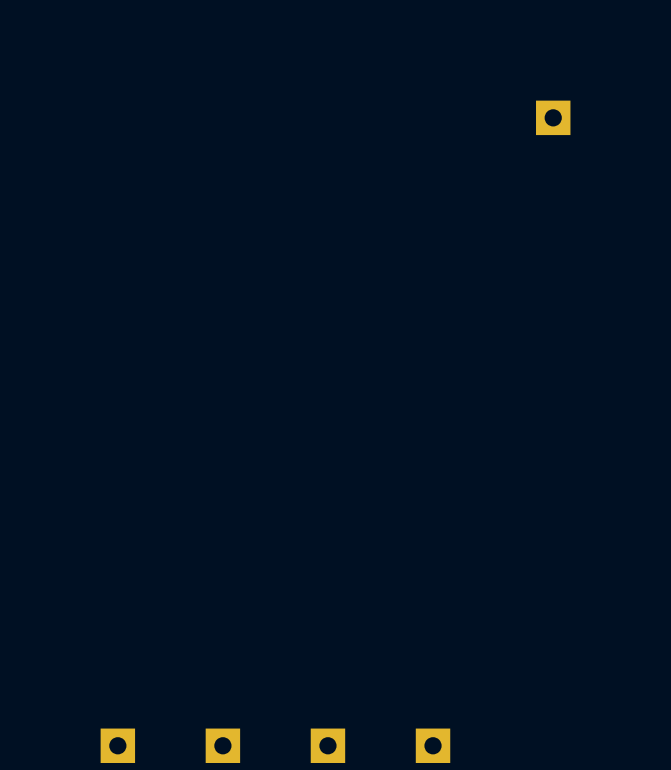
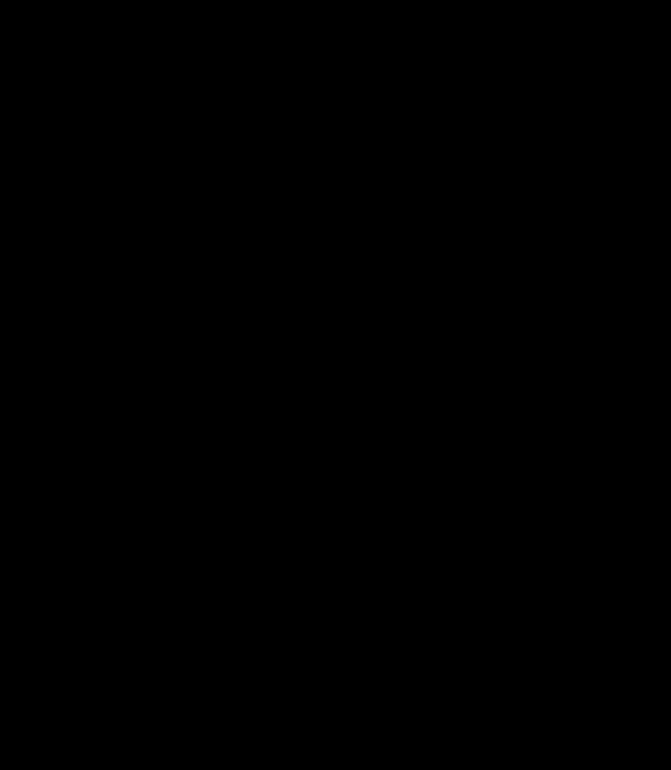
part: (553, 117) -> none
part: (117, 745) -> none
part: (222, 745) -> none
part: (327, 745) -> none
part: (433, 745) -> none

